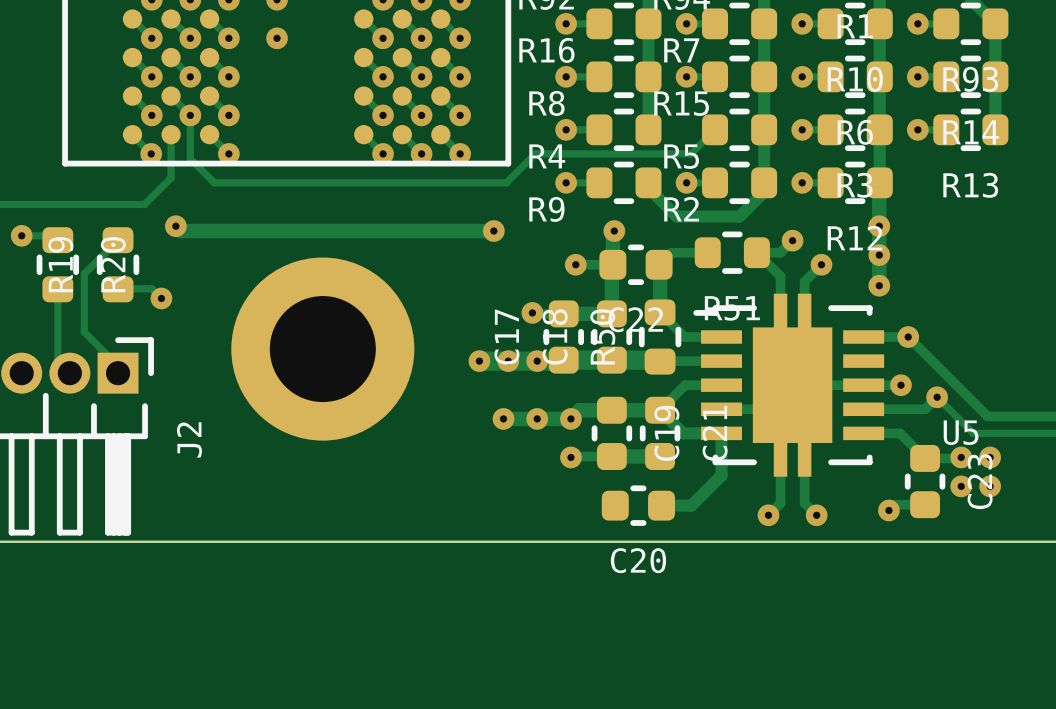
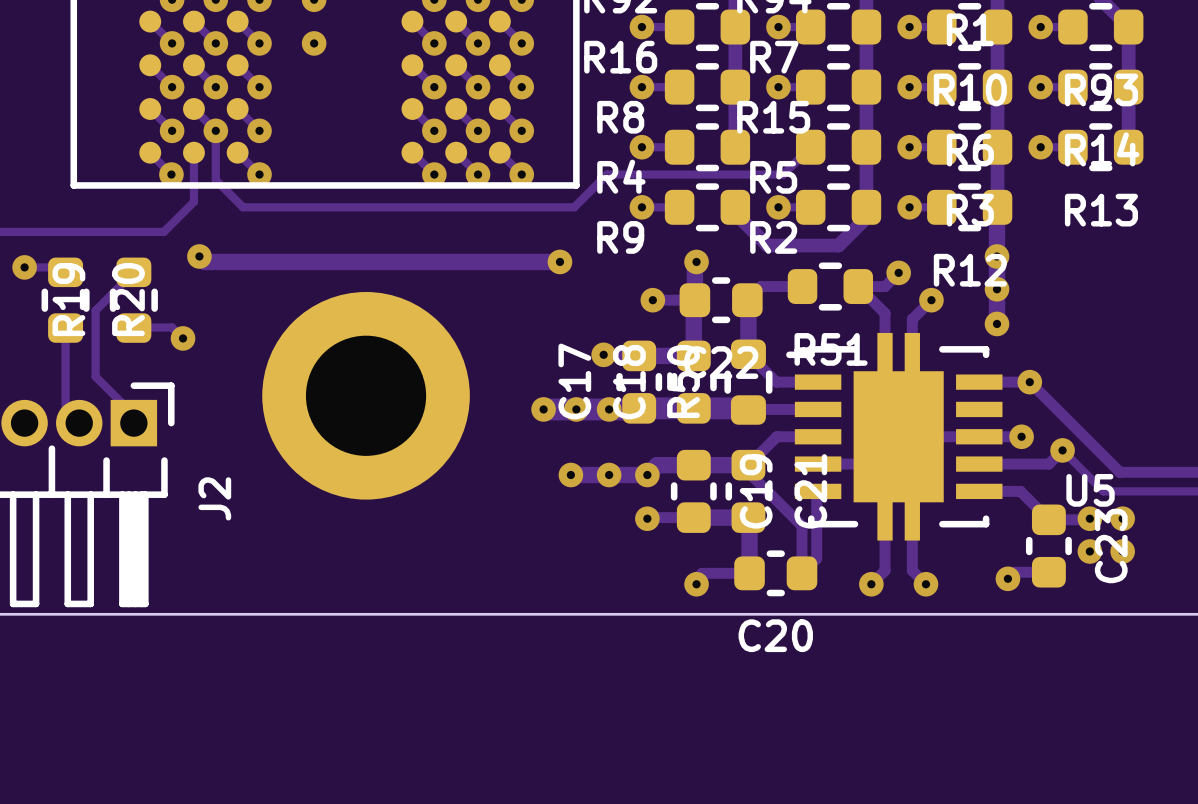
track: (660, 410) (683, 433) (721, 433) (721, 475) (691, 505) (661, 505) -> (748, 465) (748, 472) (801, 525) (801, 573) (816, 558) (818, 491)
track: none -> (748, 517) (749, 573) (702, 573) (696, 578) (696, 584)
C20 position: (638, 505) -> (775, 573)
via: none -> (696, 584)

